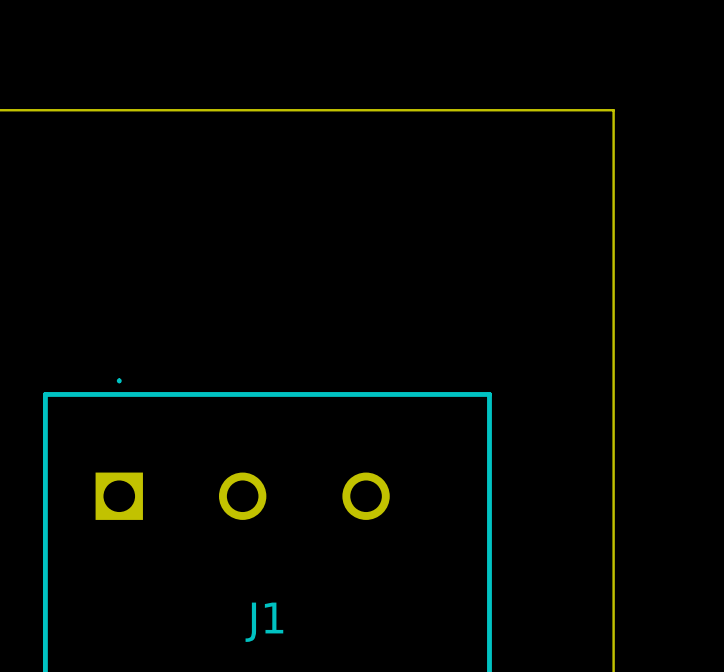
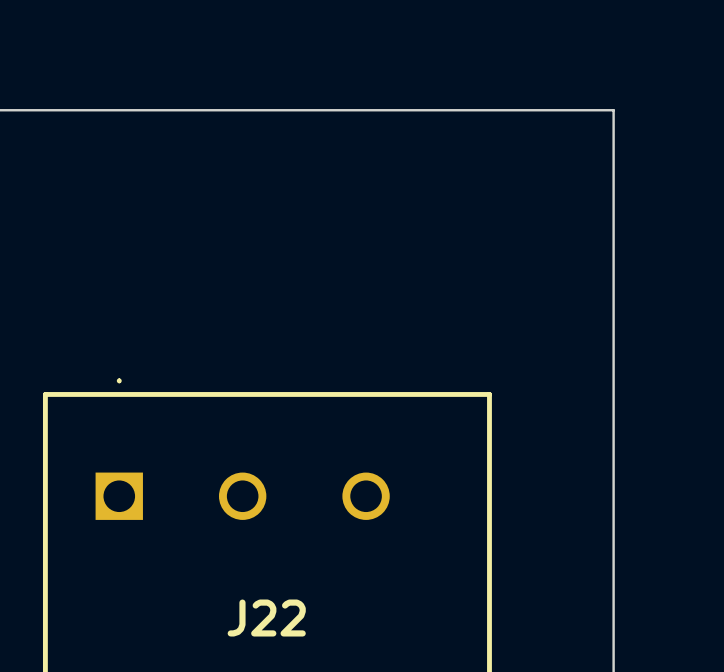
J1 name: J1 (264, 622) -> J22 (266, 618)

